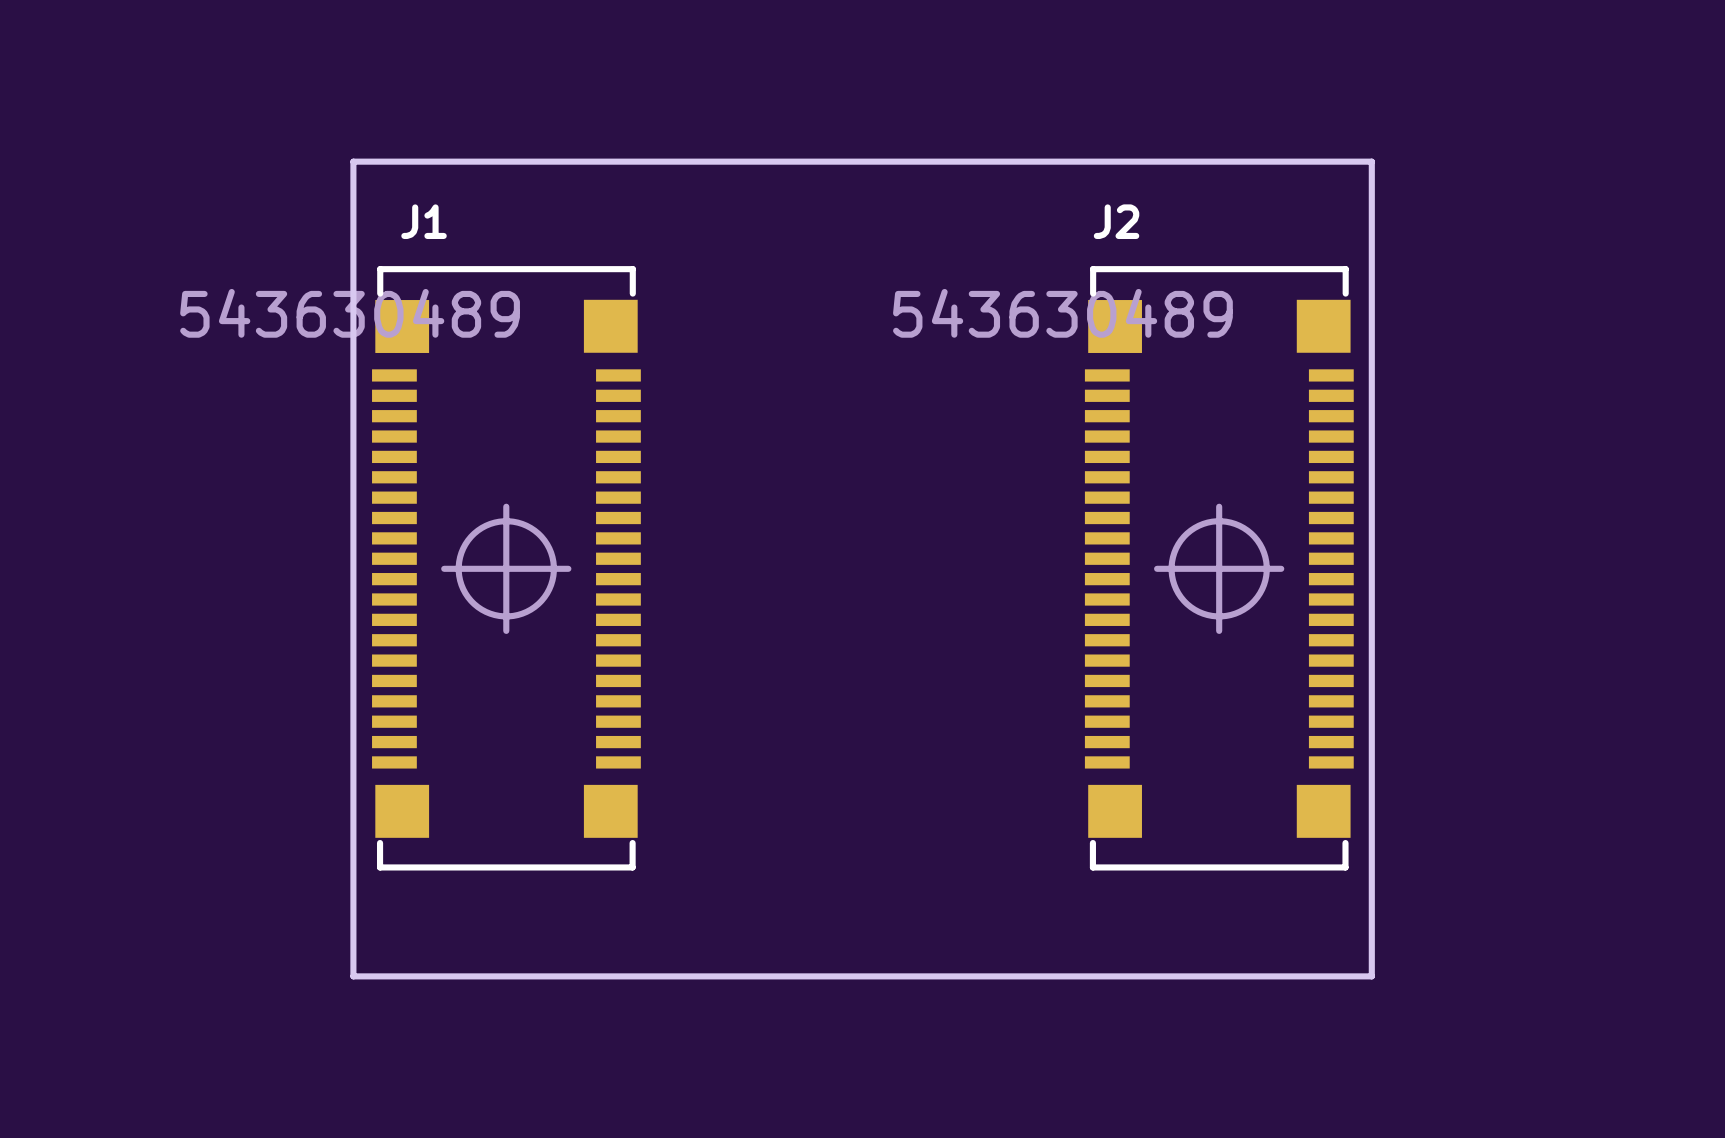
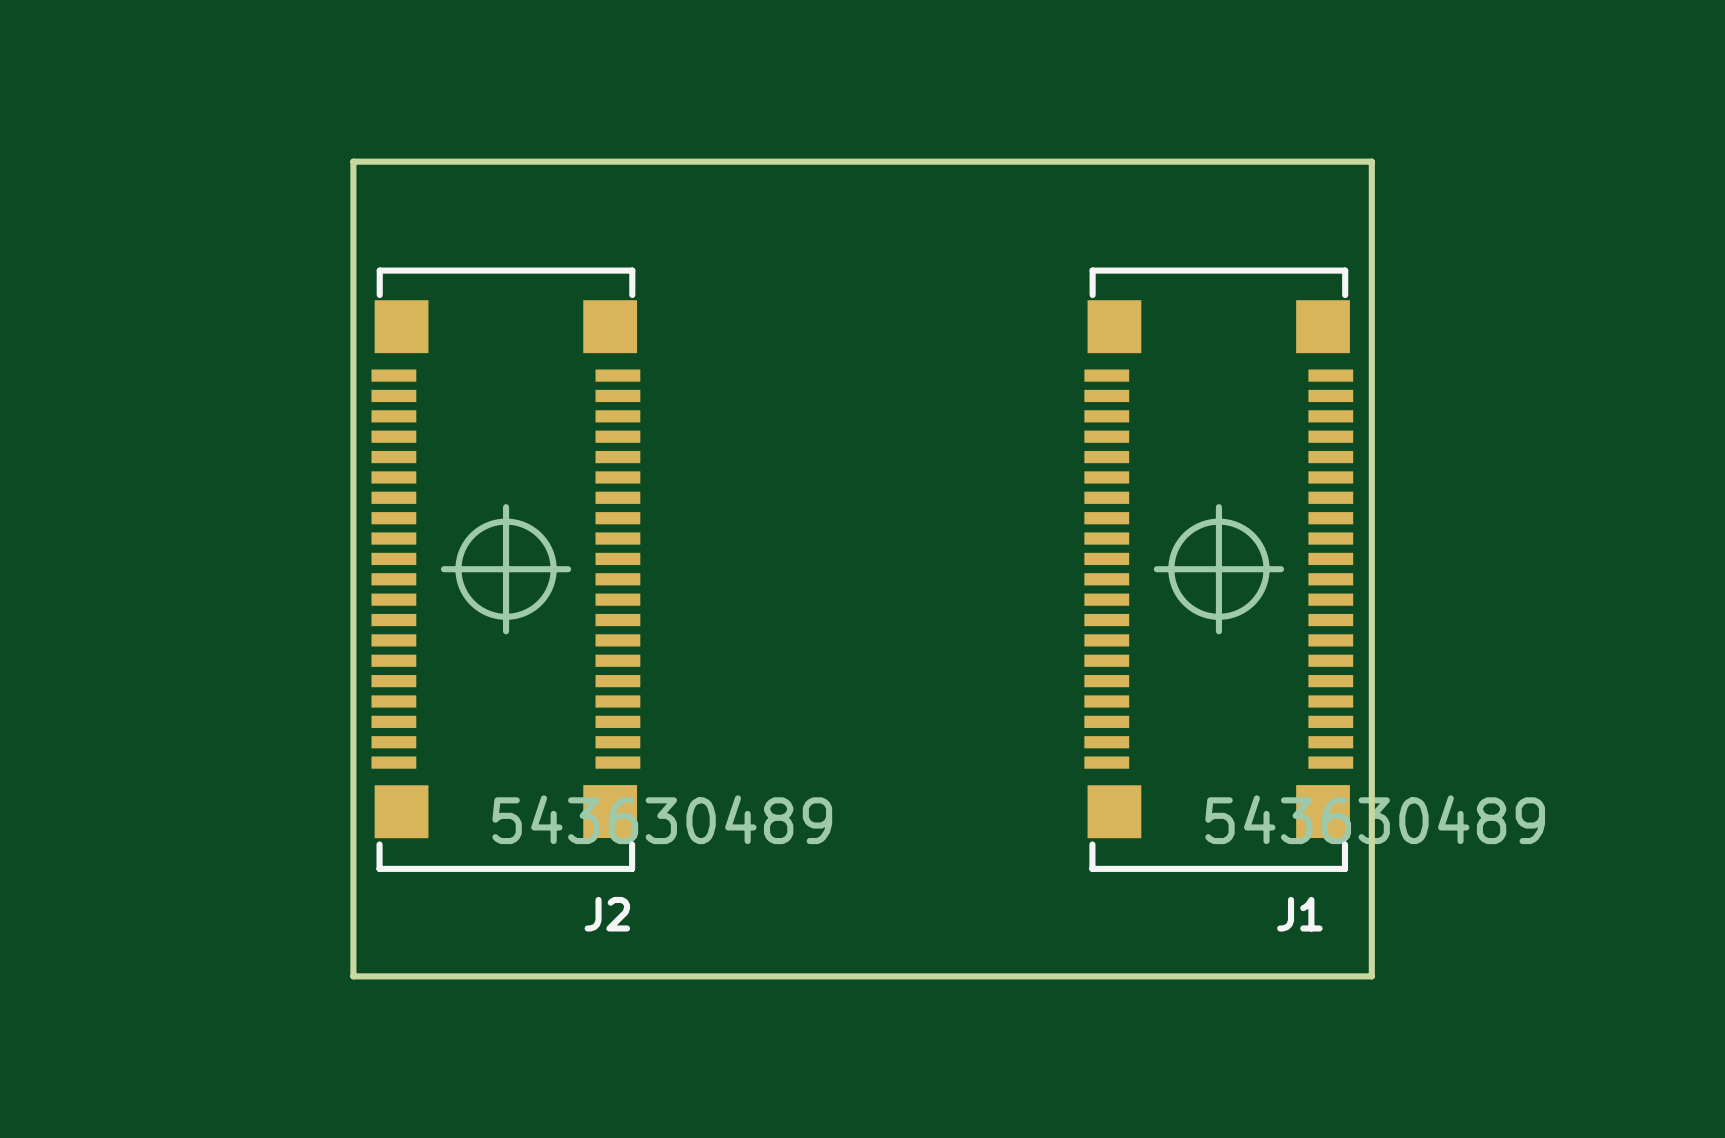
J1 rotation: 0° (506, 568) -> 180° (1218, 569)
J1 position: (506, 568) -> (1218, 569)
J2 rotation: 0° (1219, 568) -> 180° (505, 569)
J2 position: (1219, 568) -> (505, 569)

